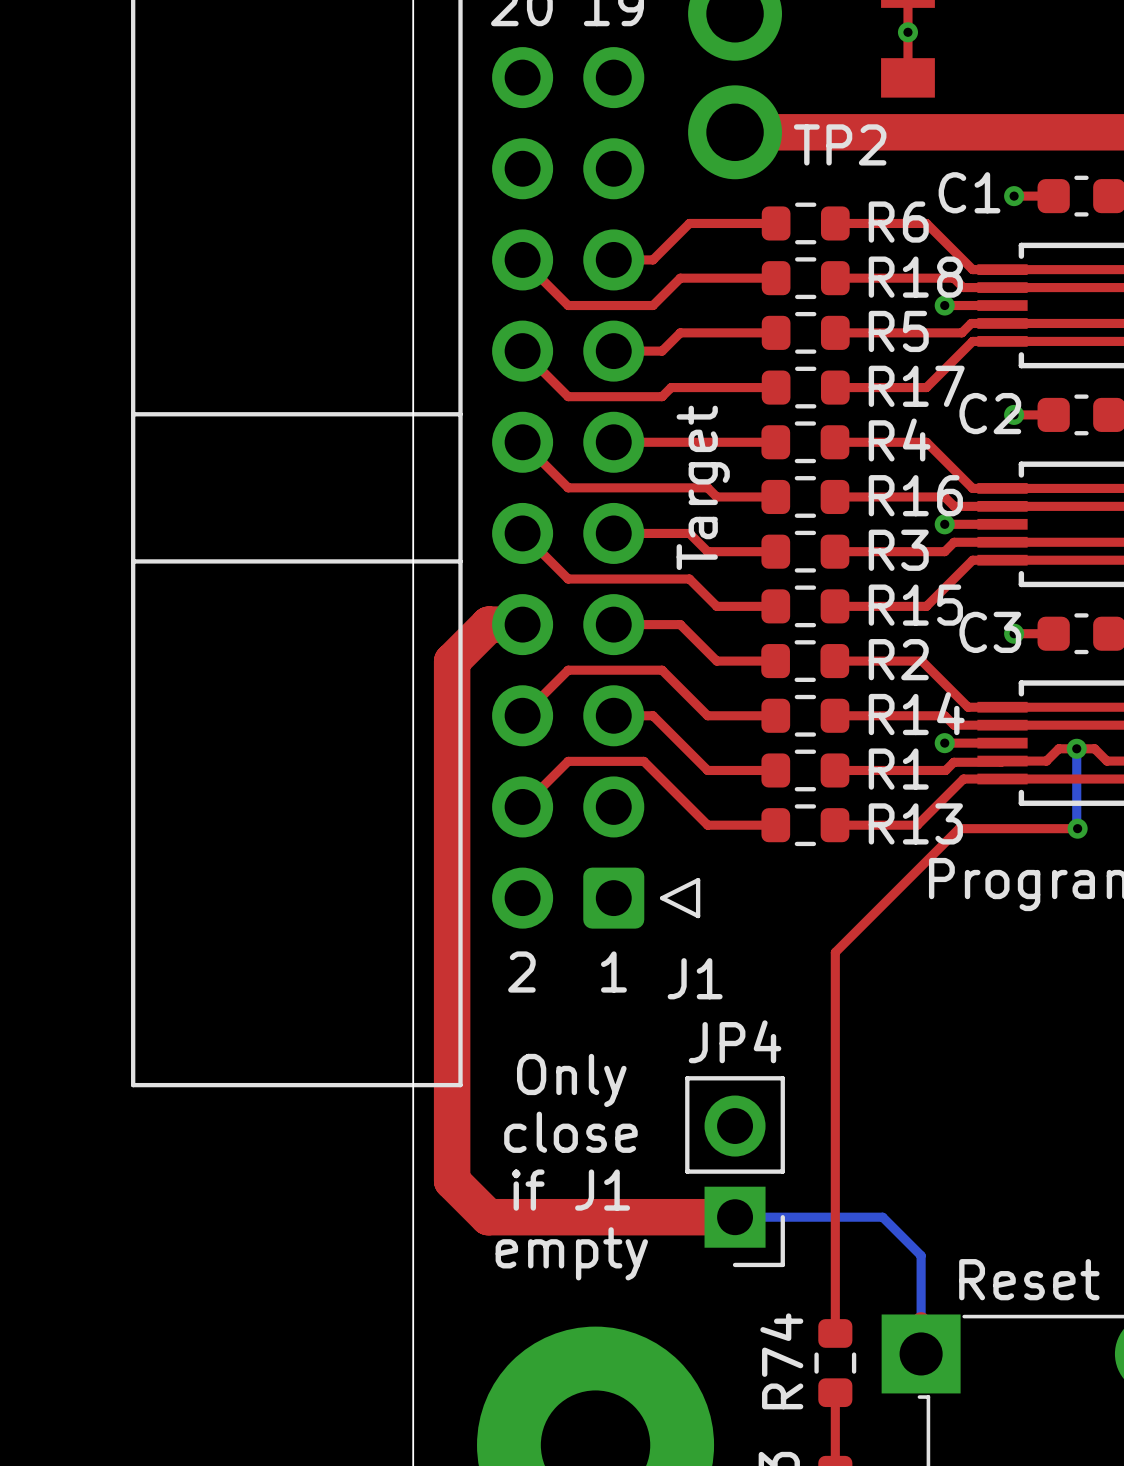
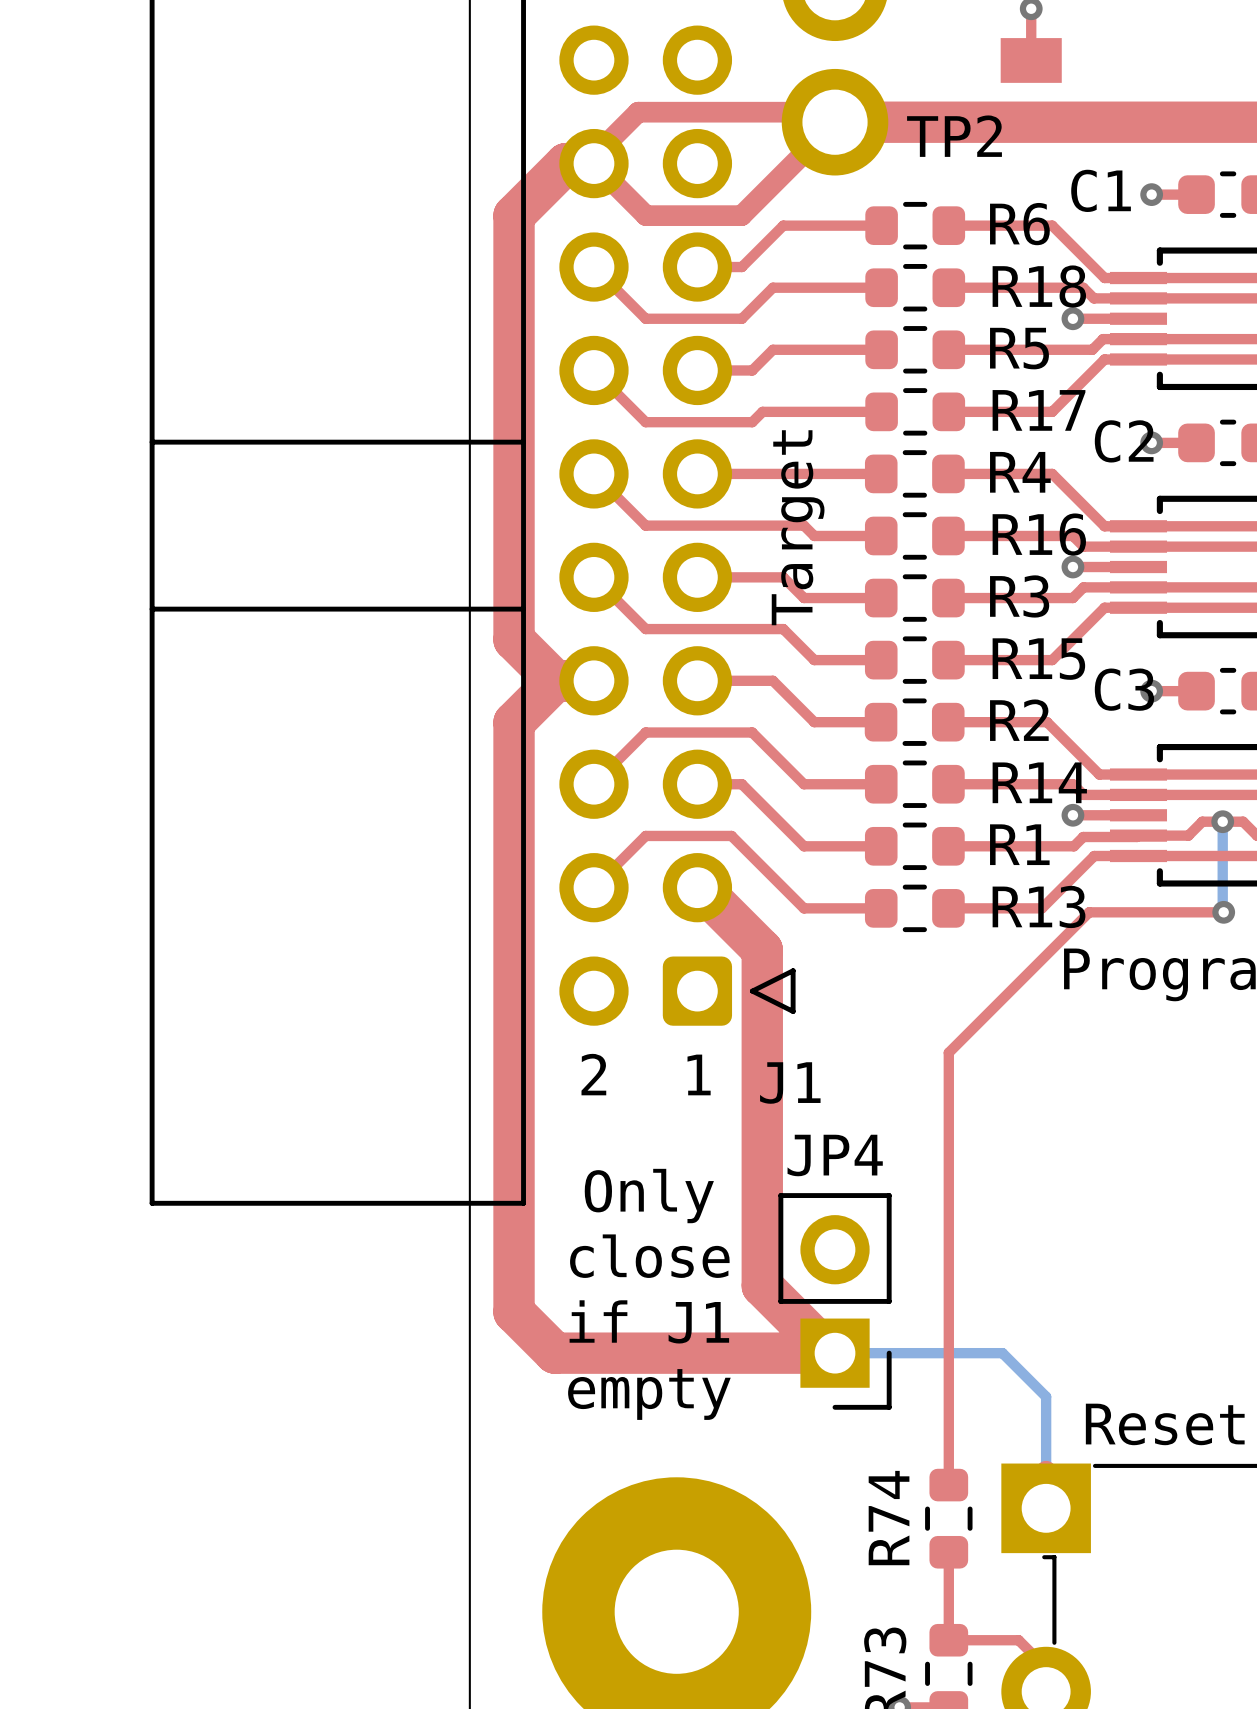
top track: none -> (593, 163) (593, 156) (638, 112) (825, 112) (835, 122) (741, 215) (646, 215) (593, 163)
top track: none -> (593, 163) (566, 163) (514, 215) (514, 639) (555, 680)
top track: none -> (697, 887) (699, 887) (762, 950) (762, 1285) (829, 1353)

